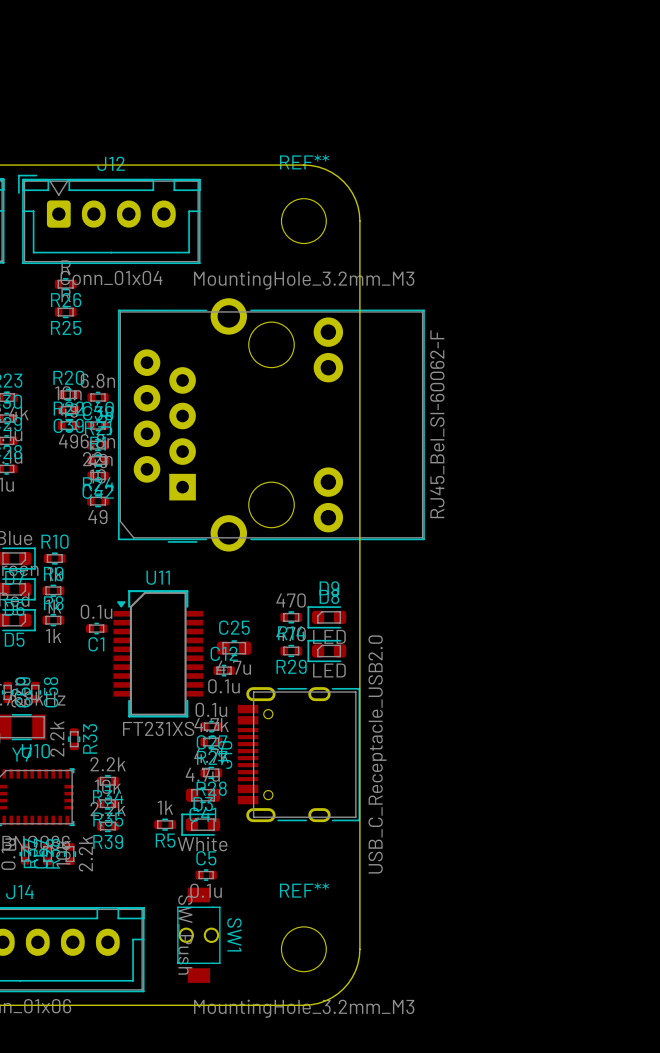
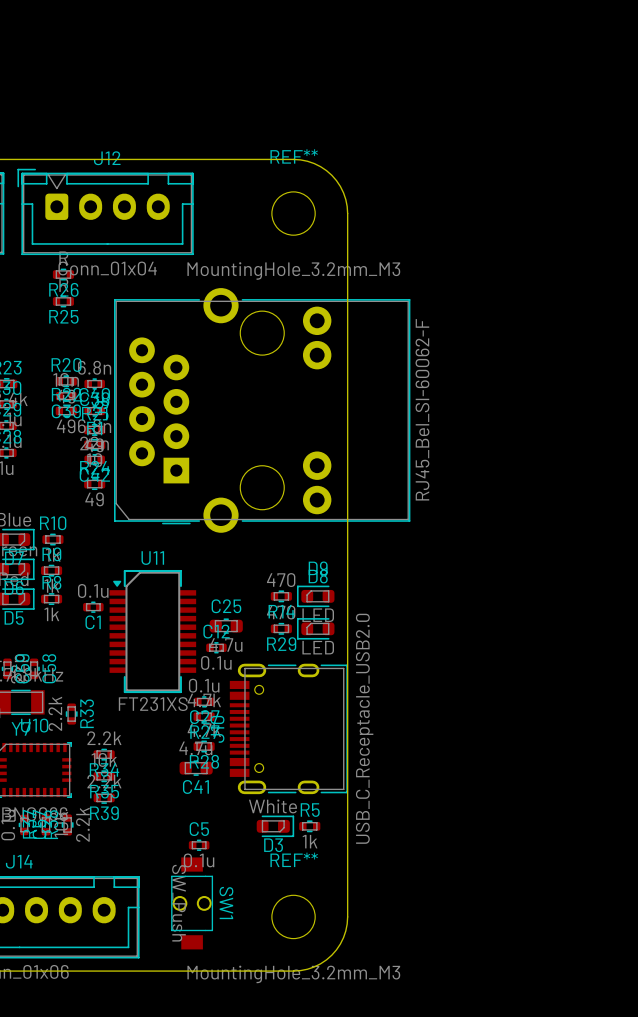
R5 value position: 1k (165, 807) -> 1k (310, 841)
R5 position: (165, 824) -> (309, 826)
D3 rotation: 0° (200, 824) -> 180° (275, 826)
D3 position: (200, 824) -> (275, 826)
R5 name position: R5 (165, 840) -> R5 (310, 810)

